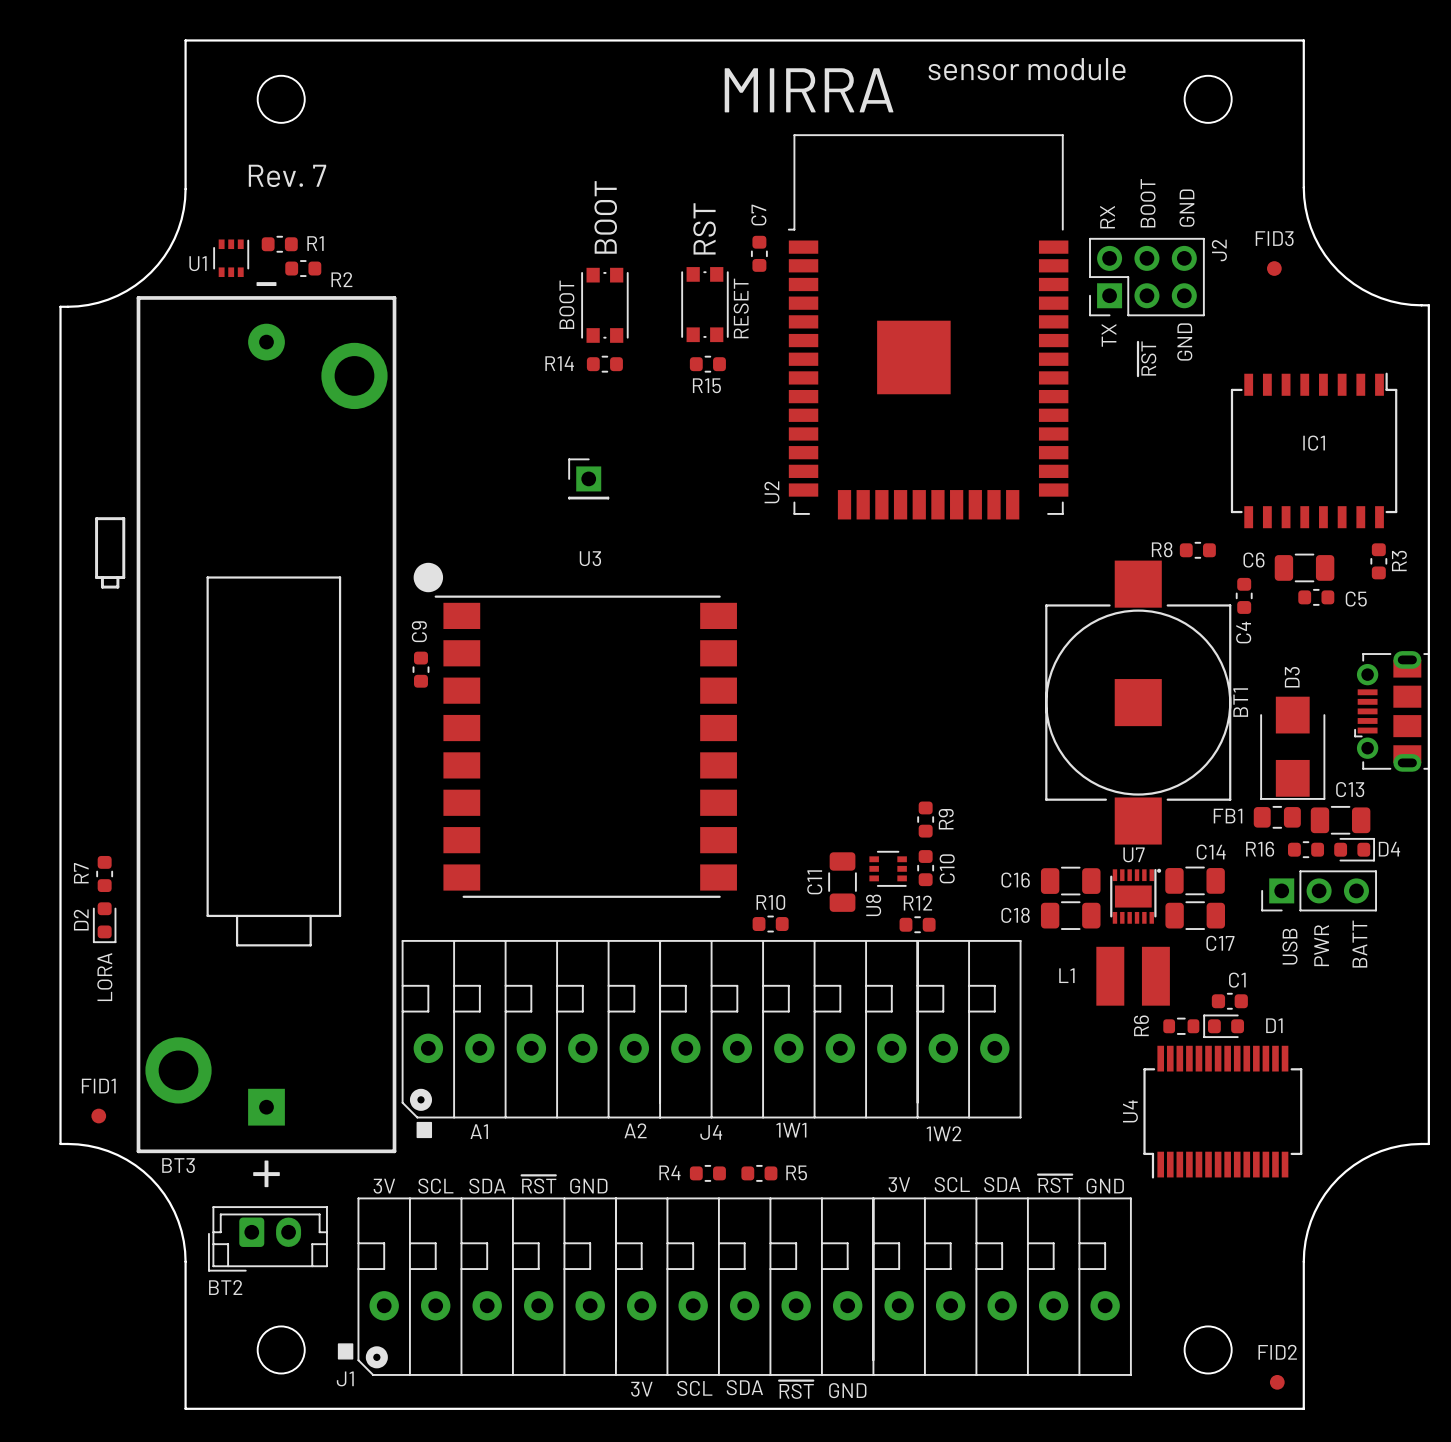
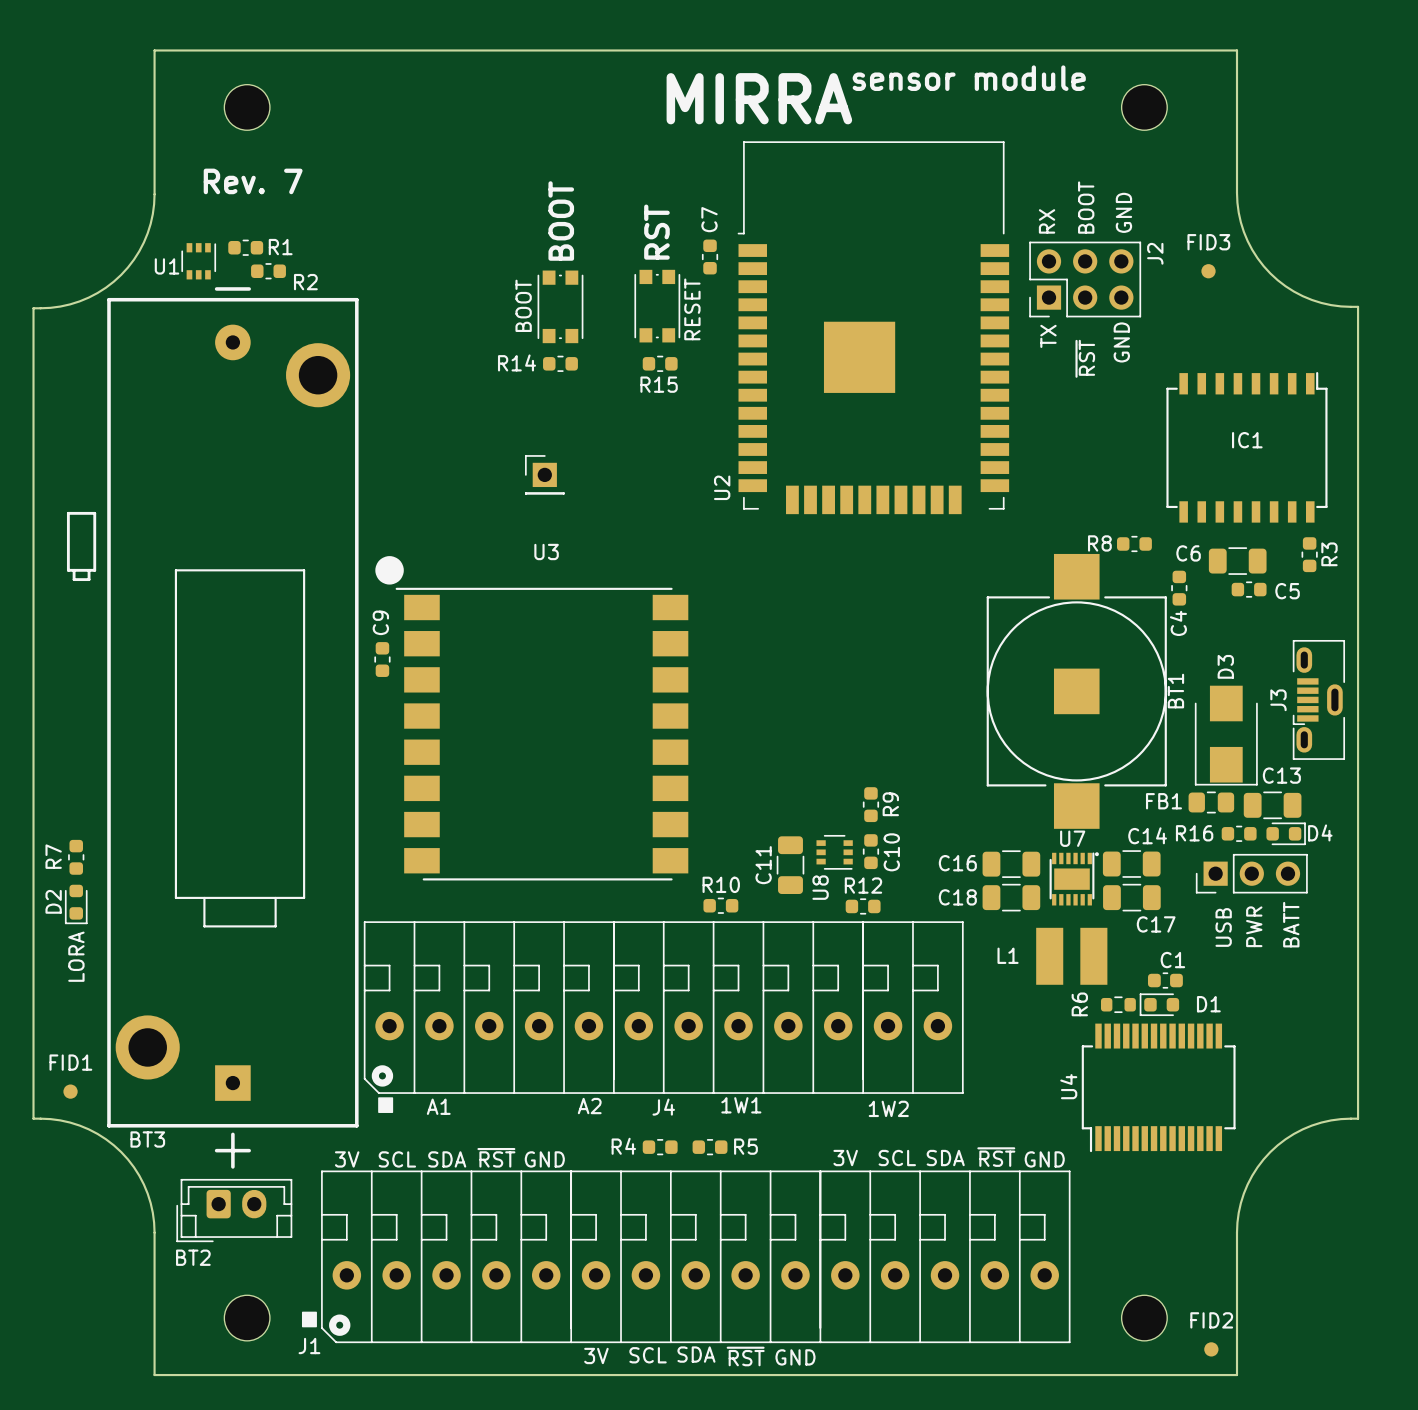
J3: none -> (1318, 699)
part: (1391, 711) -> none

